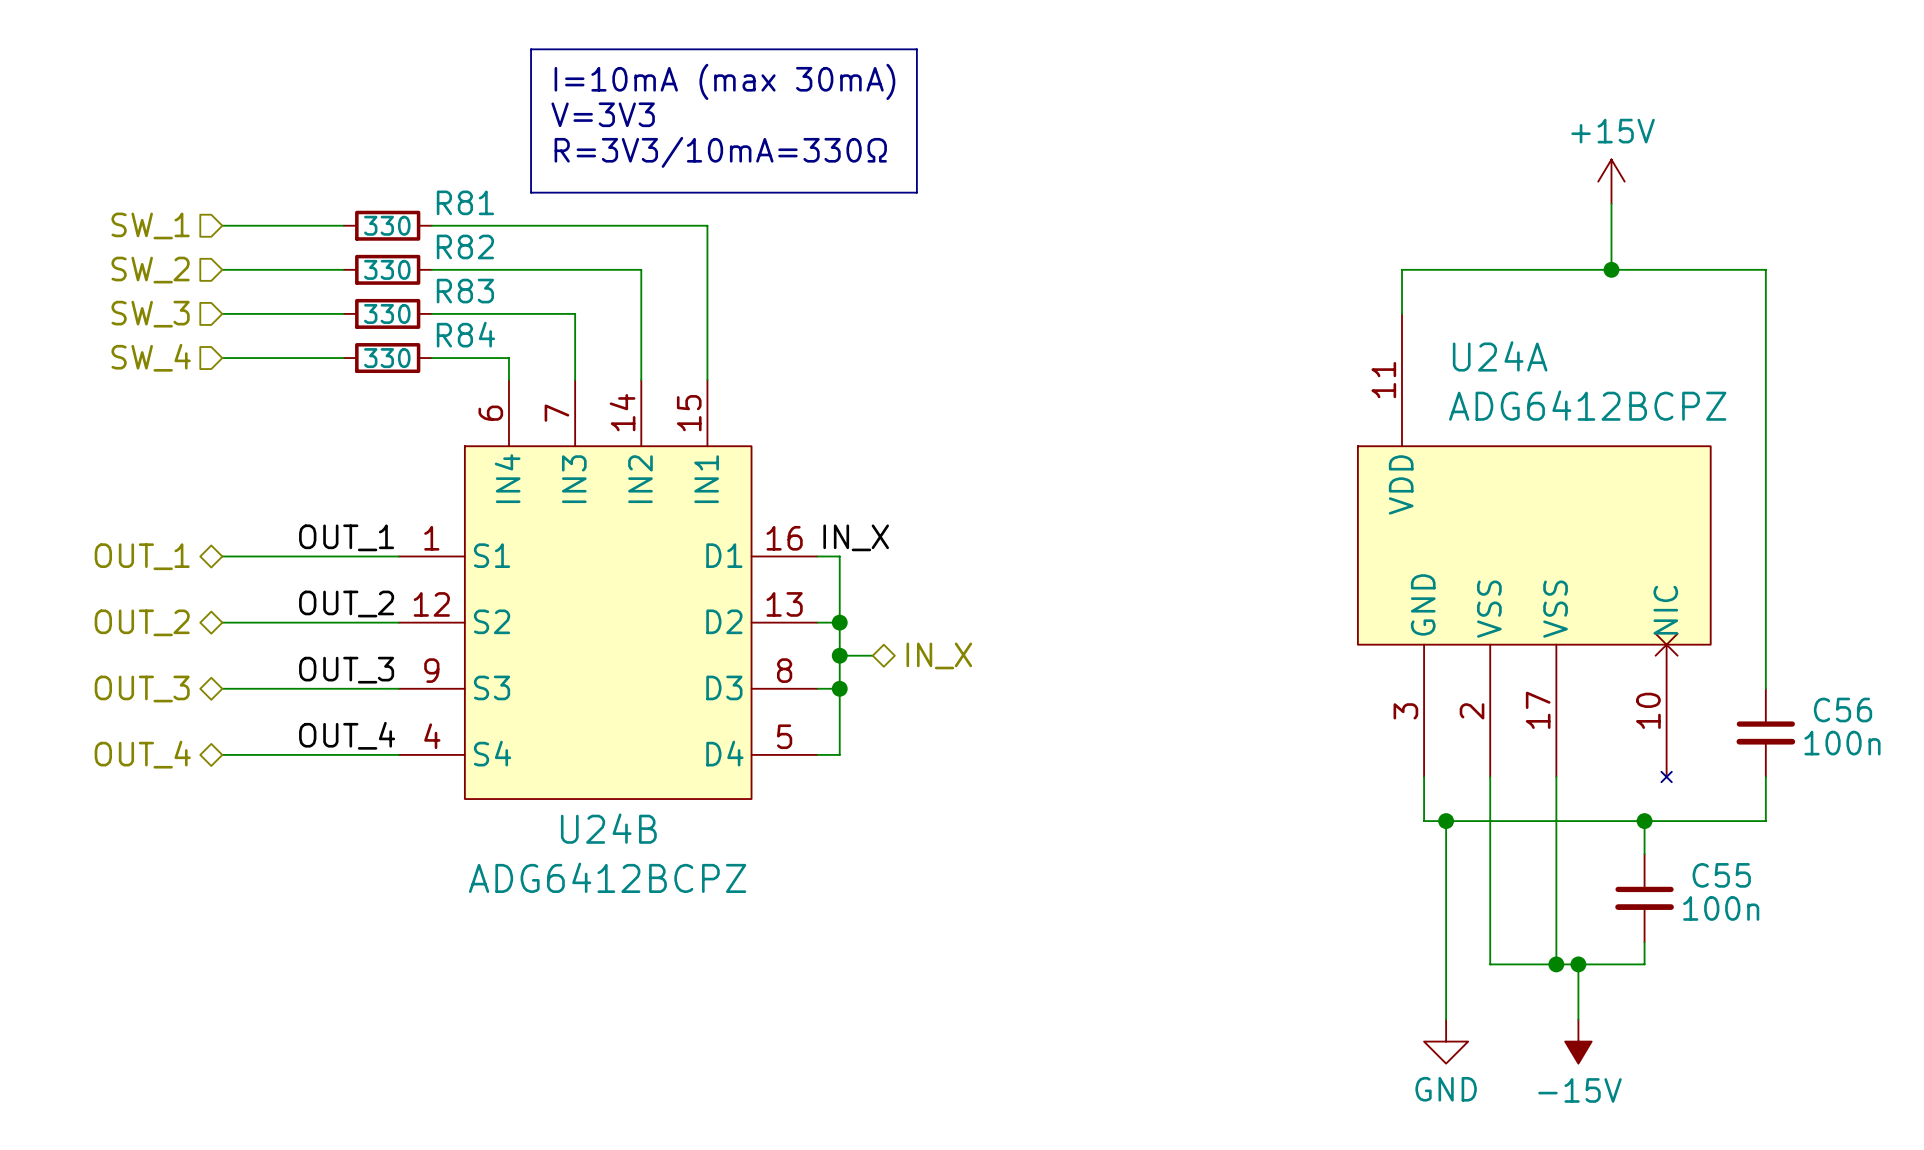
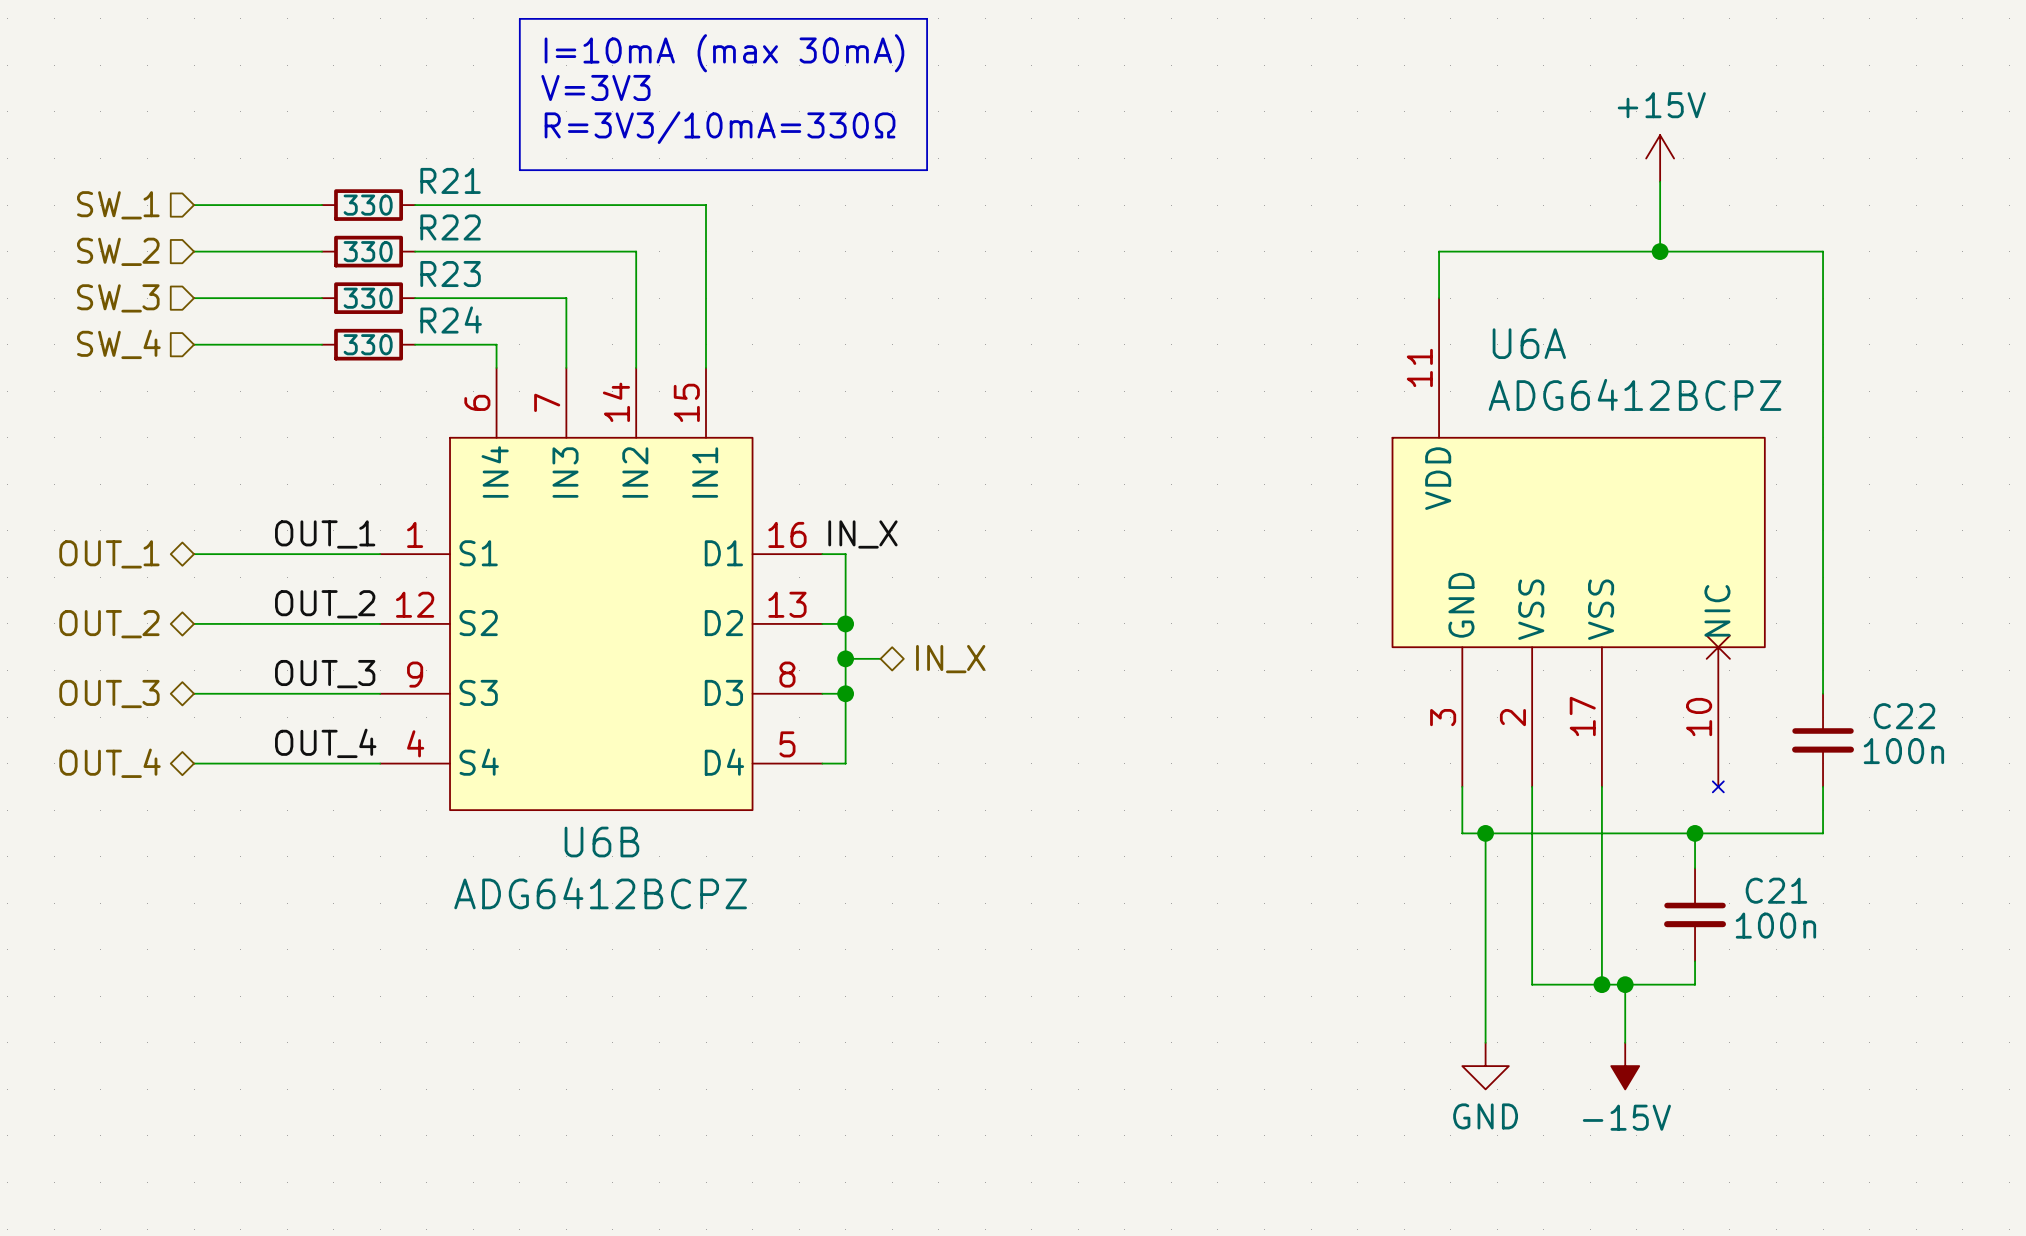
R81 name: R81 (465, 202) -> R21 (450, 180)
R82 name: R82 (465, 246) -> R22 (450, 227)
R83 name: R83 (465, 291) -> R23 (450, 274)
R84 name: R84 (465, 334) -> R24 (451, 320)
U24A name: U24A (1500, 356) -> U6A (1529, 343)
C56 name: C56 (1843, 710) -> C22 (1904, 716)
U24B name: U24B (608, 828) -> U6B (601, 842)
C55 name: C55 (1721, 875) -> C21 (1776, 890)

